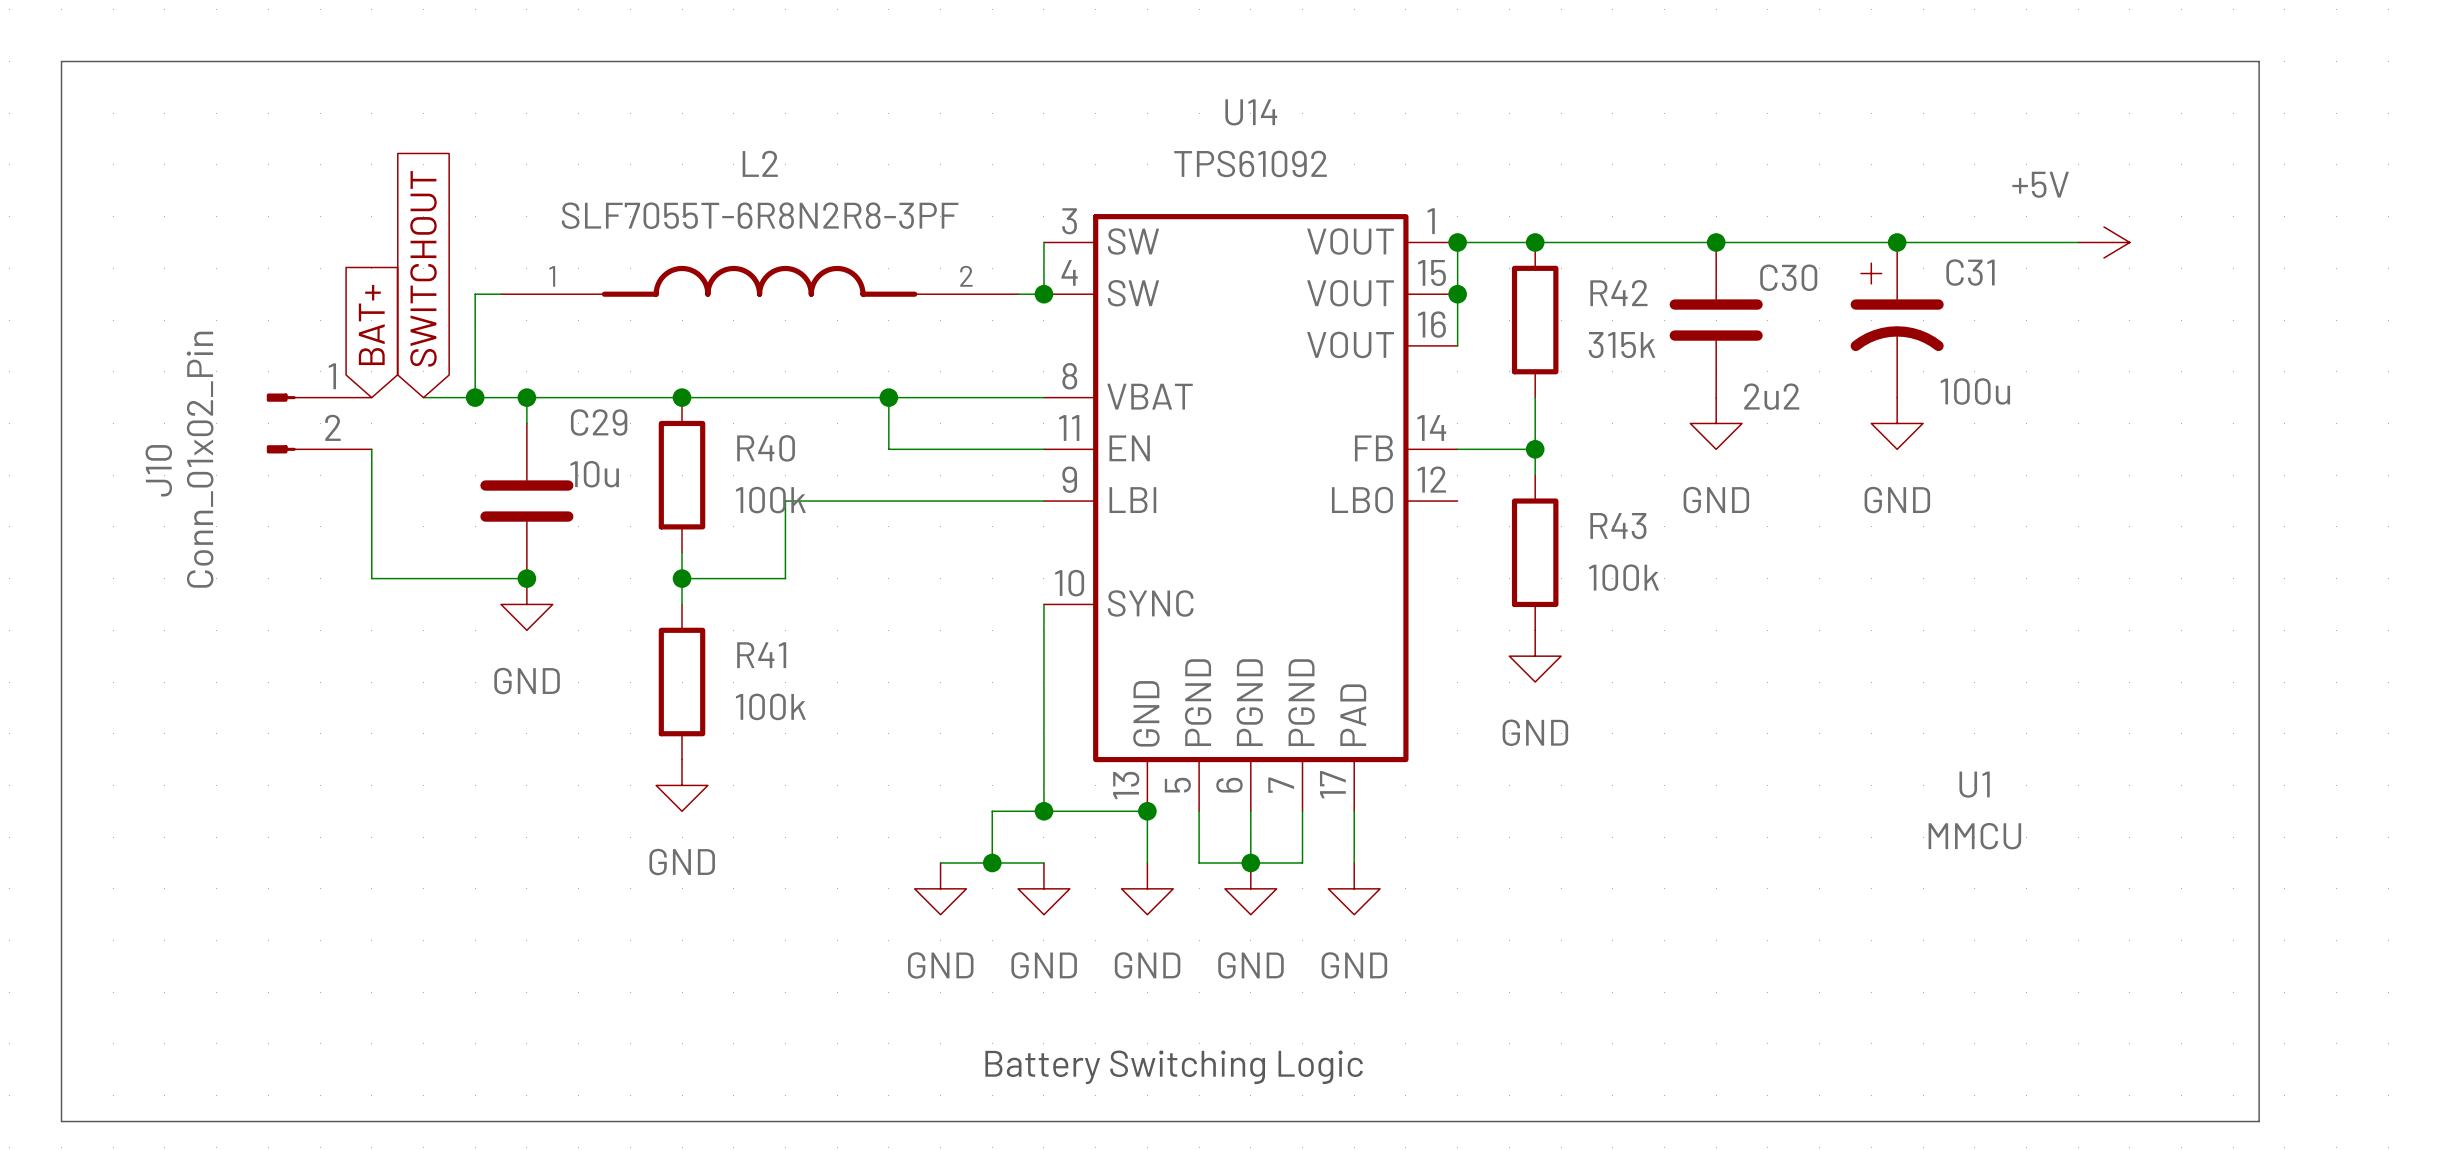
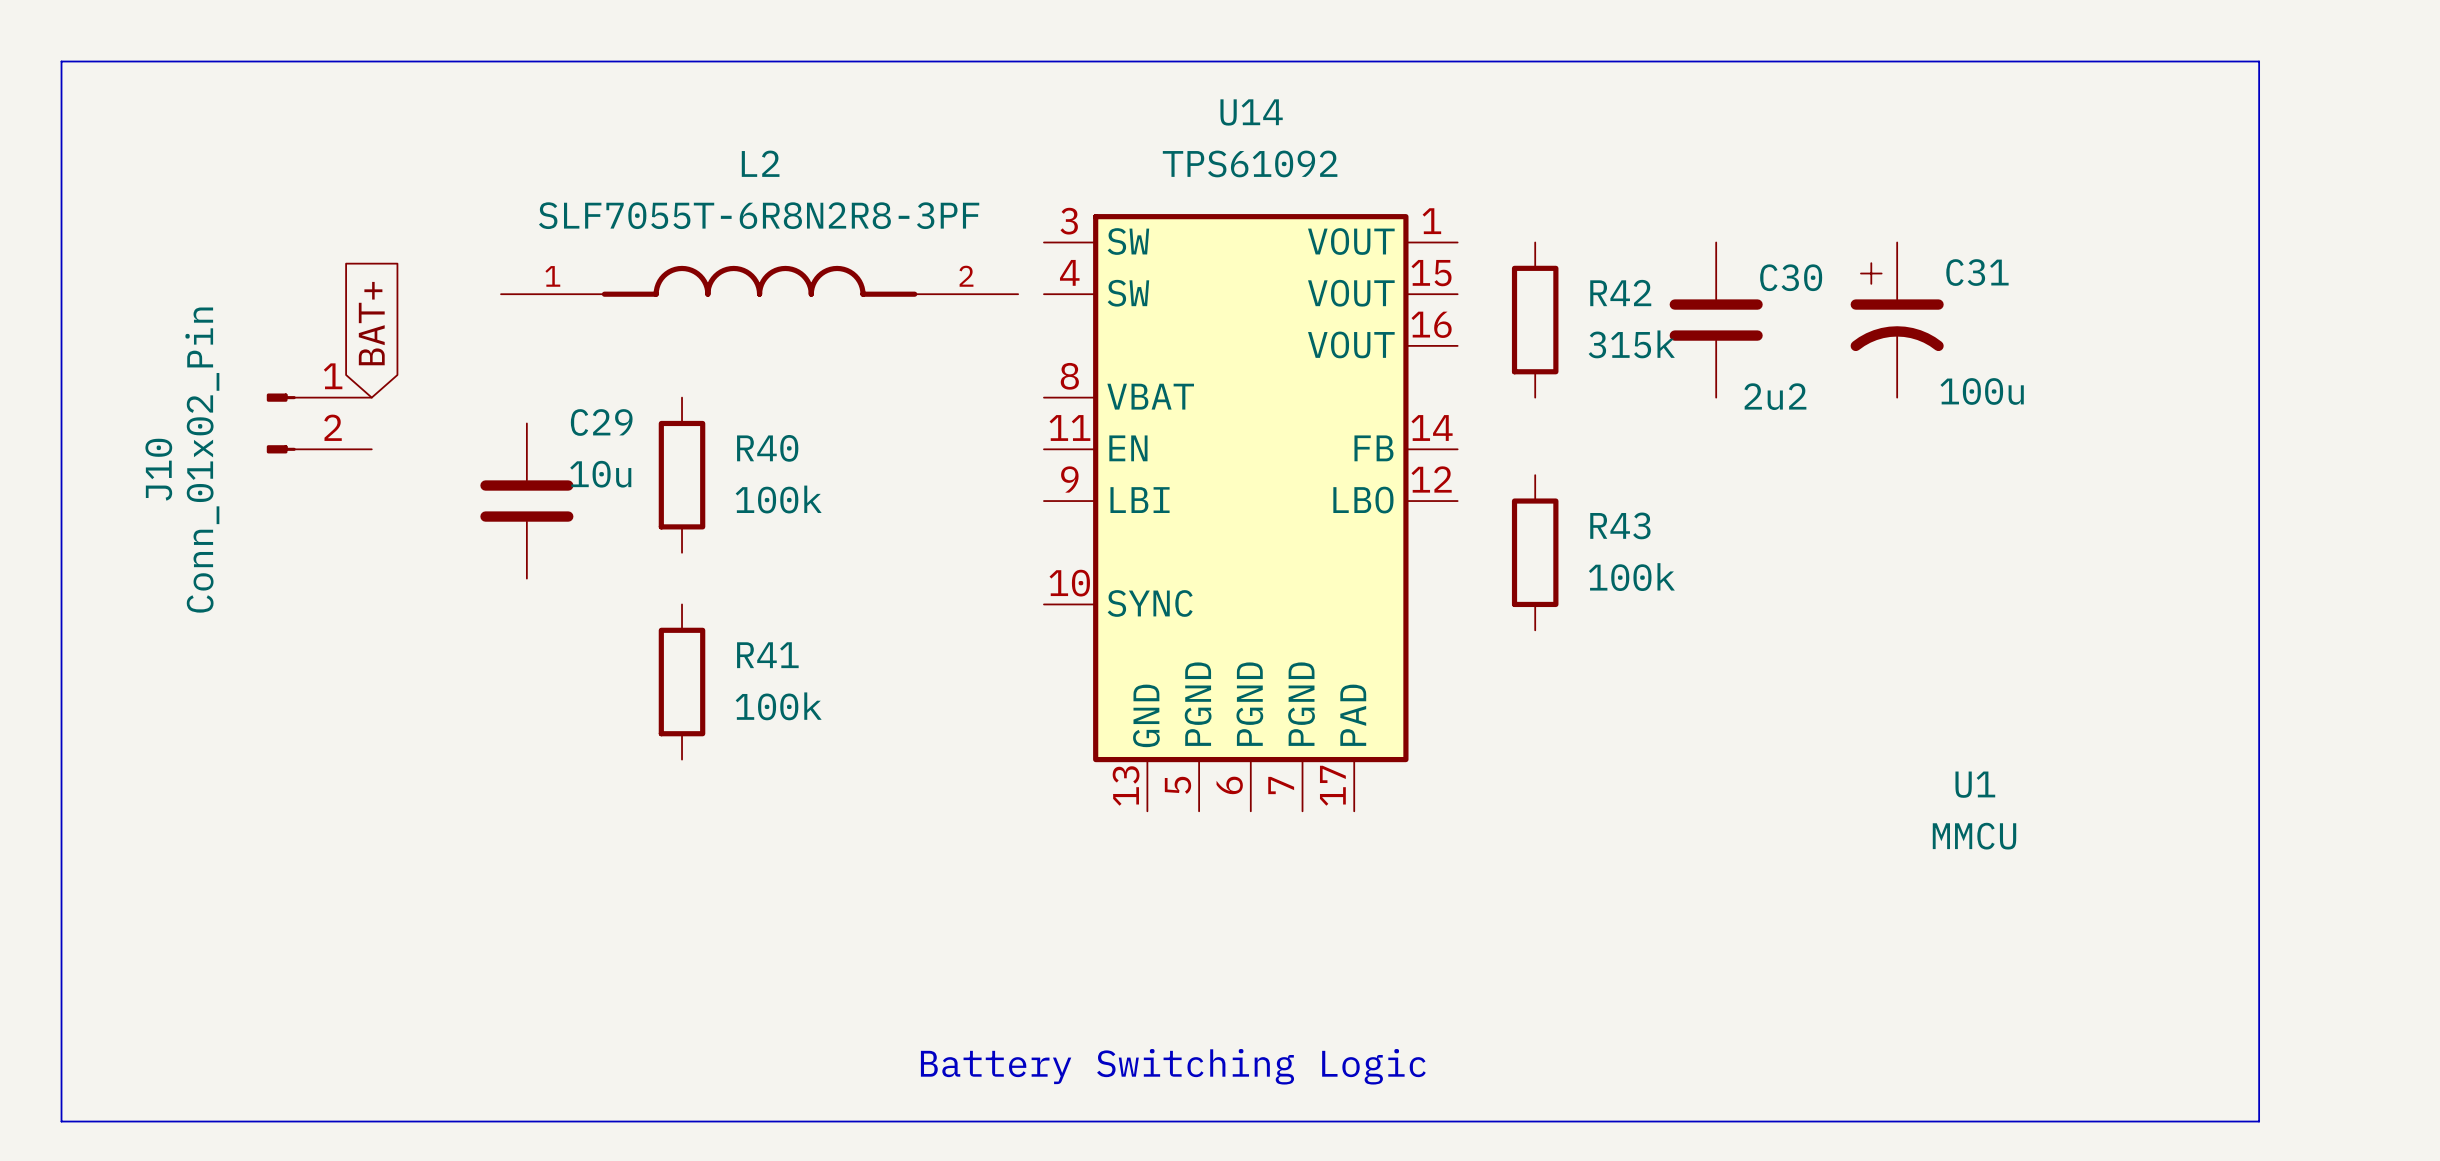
wire: (1043, 242) (1043, 294) (1018, 294) -> none
junction: (1457, 242) -> none
junction: (1535, 242) -> none
junction: (1716, 242) -> none
junction: (1897, 242) -> none
wire: (2078, 242) (1457, 242) (1457, 345) -> none
power symbol: +5V (2103, 242) -> none
global label: SWITCHOUT (423, 268) -> none
wire: (501, 294) (475, 294) (475, 397) -> none
junction: (1043, 294) -> none
junction: (1457, 294) -> none
wire: (423, 397) (1043, 397) -> none
junction: (475, 397) -> none
wire: (526, 397) (526, 423) -> none
junction: (526, 397) -> none
junction: (682, 397) -> none
wire: (888, 397) (888, 449) (1043, 449) -> none
junction: (888, 397) -> none
wire: (1535, 397) (1535, 475) -> none
power symbol: GND (1716, 423) -> none
power symbol: GND (1897, 423) -> none
wire: (371, 449) (371, 578) (526, 578) -> none
wire: (1457, 449) (1535, 449) -> none
junction: (1535, 449) -> none
wire: (1043, 501) (785, 501) (785, 578) (682, 578) -> none
wire: (682, 552) (682, 604) -> none
junction: (526, 578) -> none
junction: (682, 578) -> none
power symbol: GND (526, 604) -> none
wire: (1043, 604) (1043, 811) -> none
power symbol: GND (1535, 656) -> none
power symbol: GND (682, 785) -> none
junction: (1043, 811) -> none
junction: (1147, 811) -> none
wire: (1199, 811) (1199, 862) (1302, 862) (1302, 811) -> none
wire: (1250, 811) (1250, 862) -> none
wire: (1354, 811) (1354, 862) -> none
wire: (940, 862) (1043, 862) -> none
wire: (992, 862) (992, 811) (1147, 811) (1147, 862) -> none
junction: (992, 862) -> none
junction: (1250, 862) -> none
power symbol: GND (940, 888) -> none
power symbol: GND (1043, 888) -> none
power symbol: GND (1147, 888) -> none
power symbol: GND (1250, 888) -> none
power symbol: GND (1354, 888) -> none

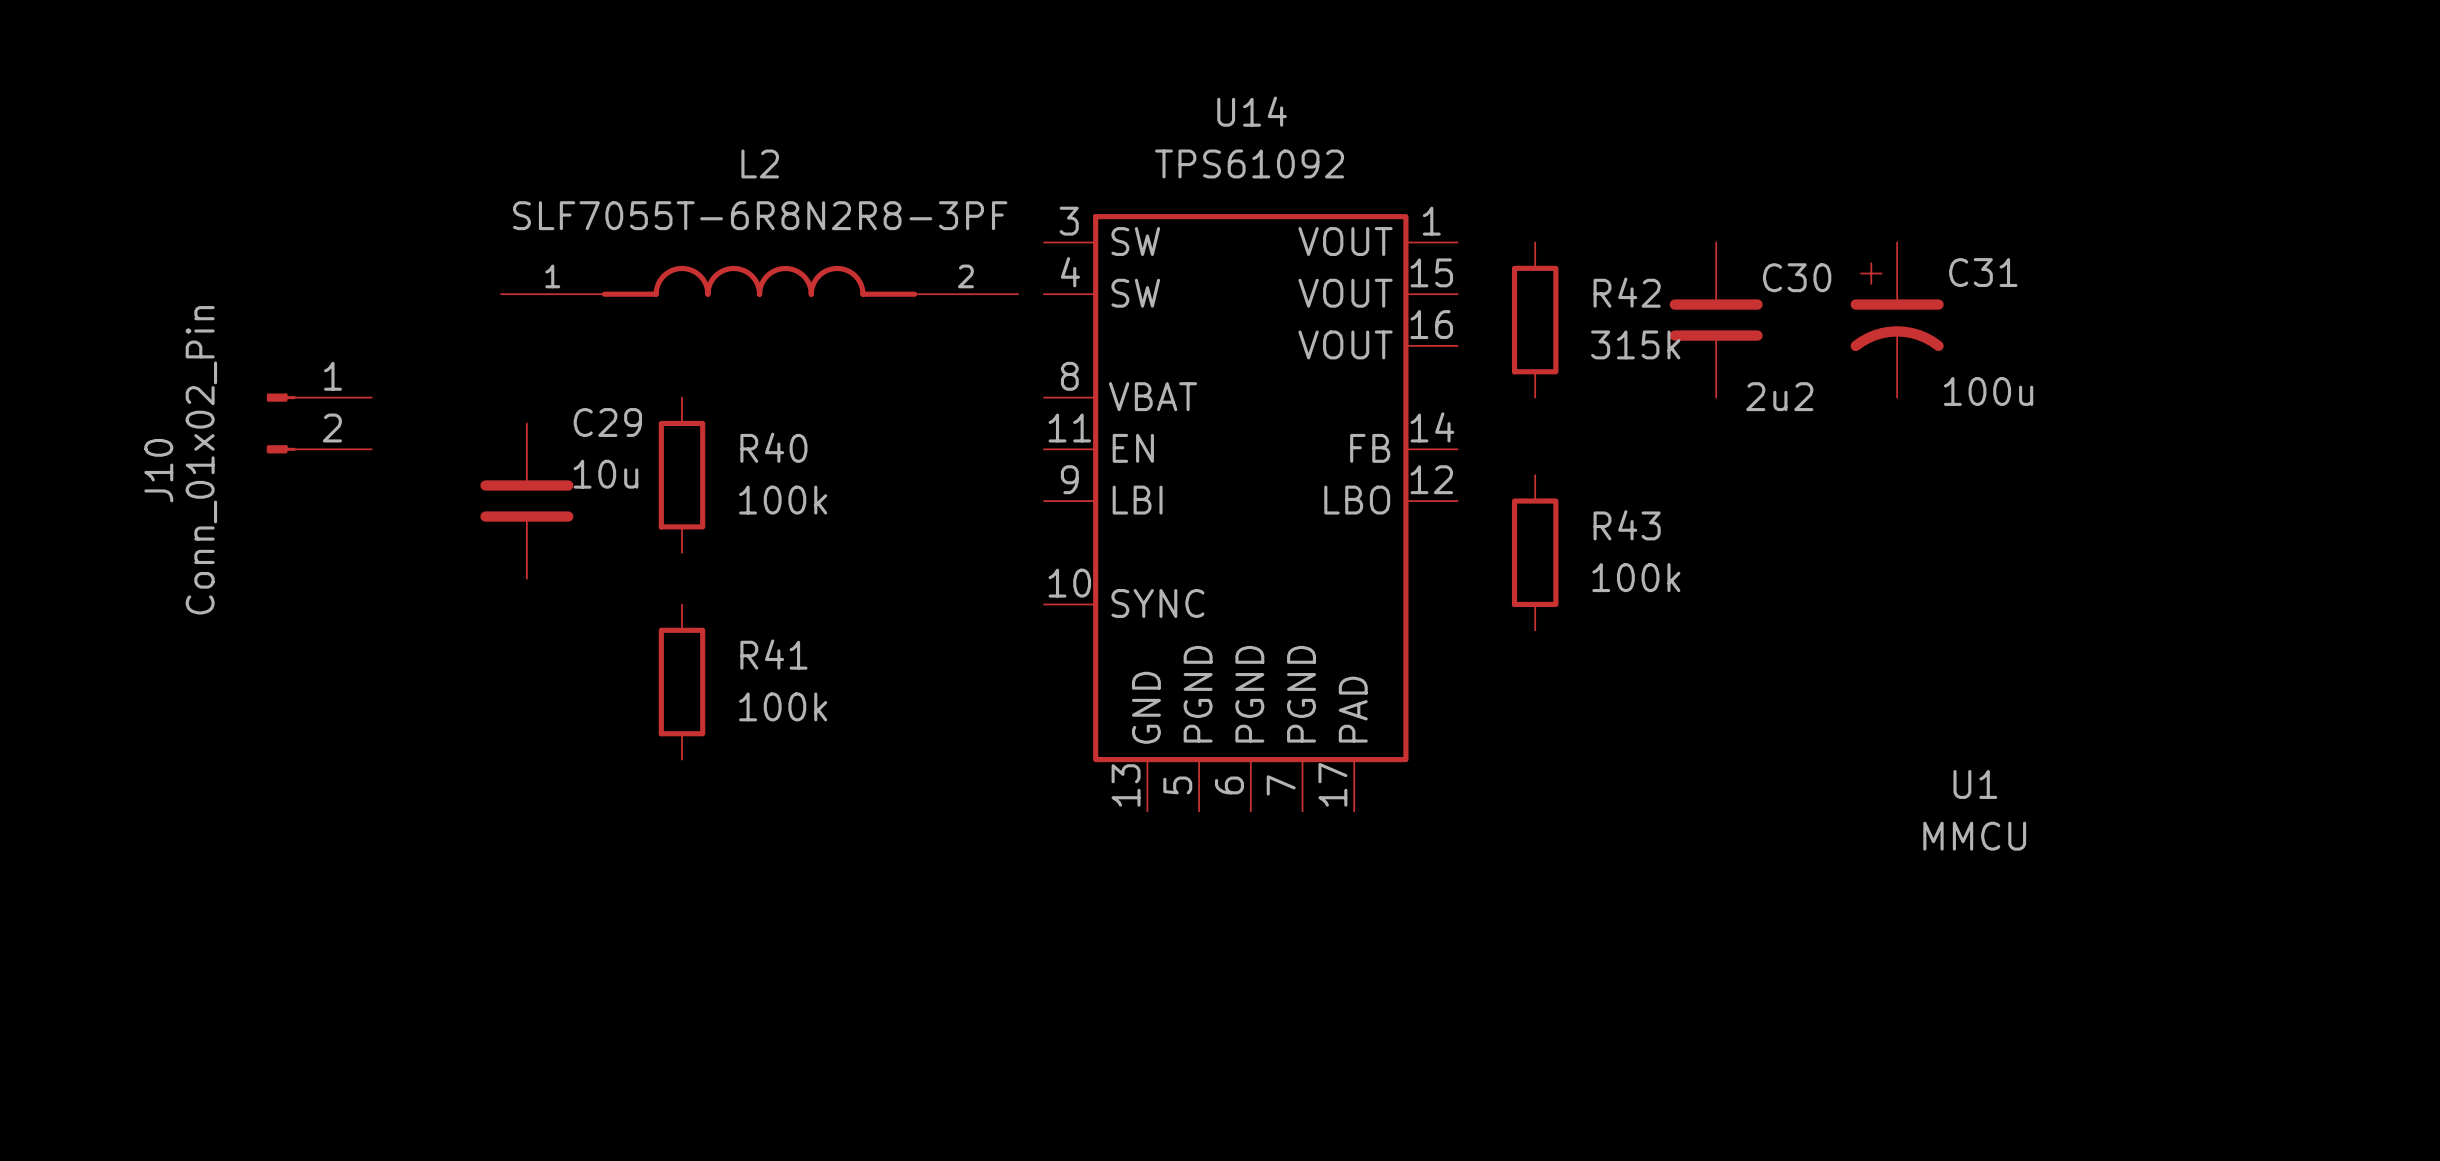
line: (61, 61) (2259, 61) (2259, 1121) (61, 1121) (61, 61) -> none
global label: BAT+ (371, 323) -> none
text: Battery Switching Logic (1173, 1066) -> none

